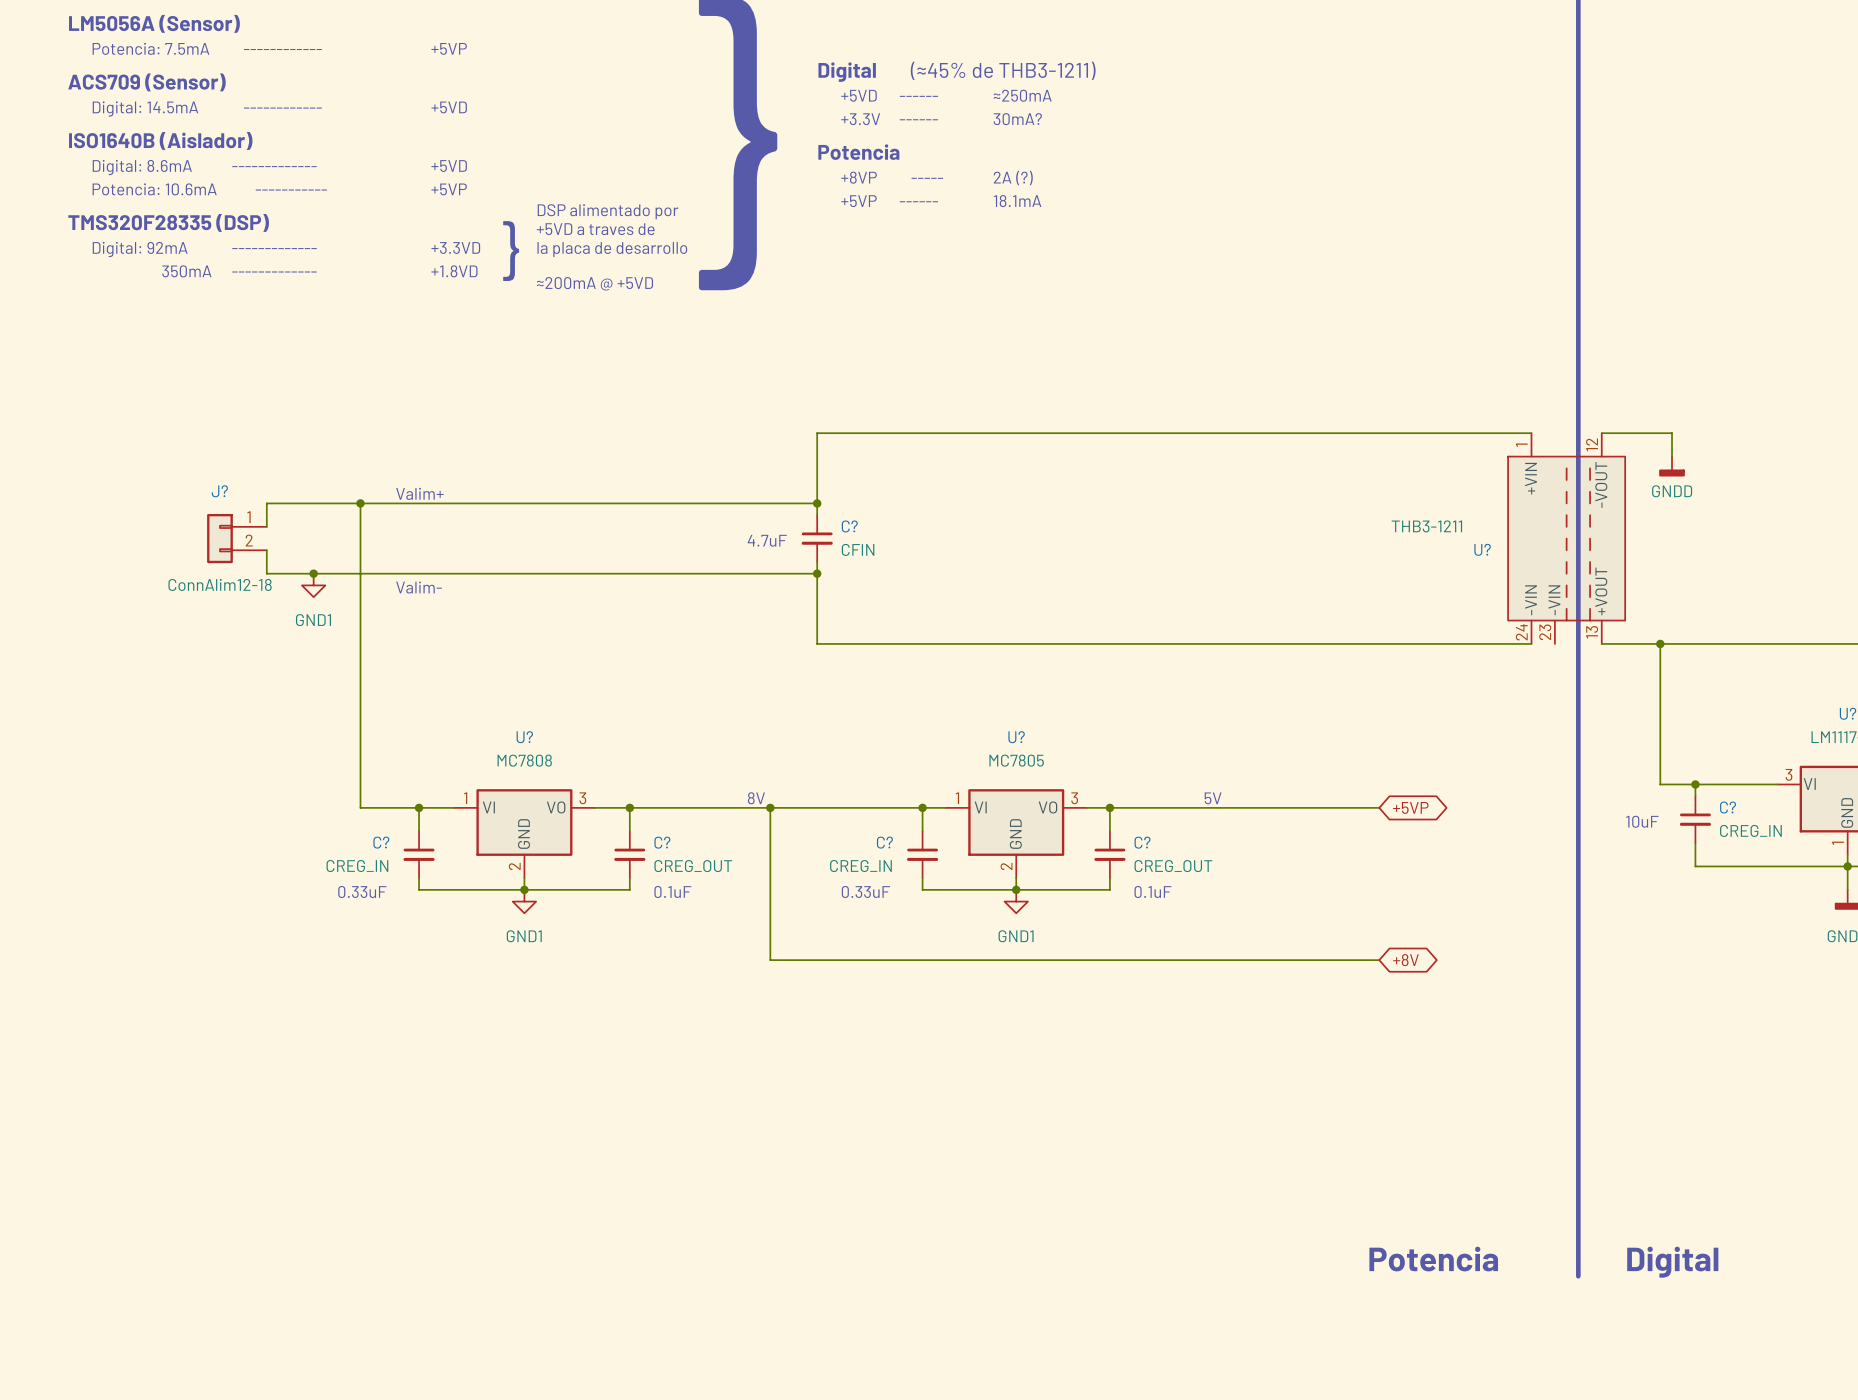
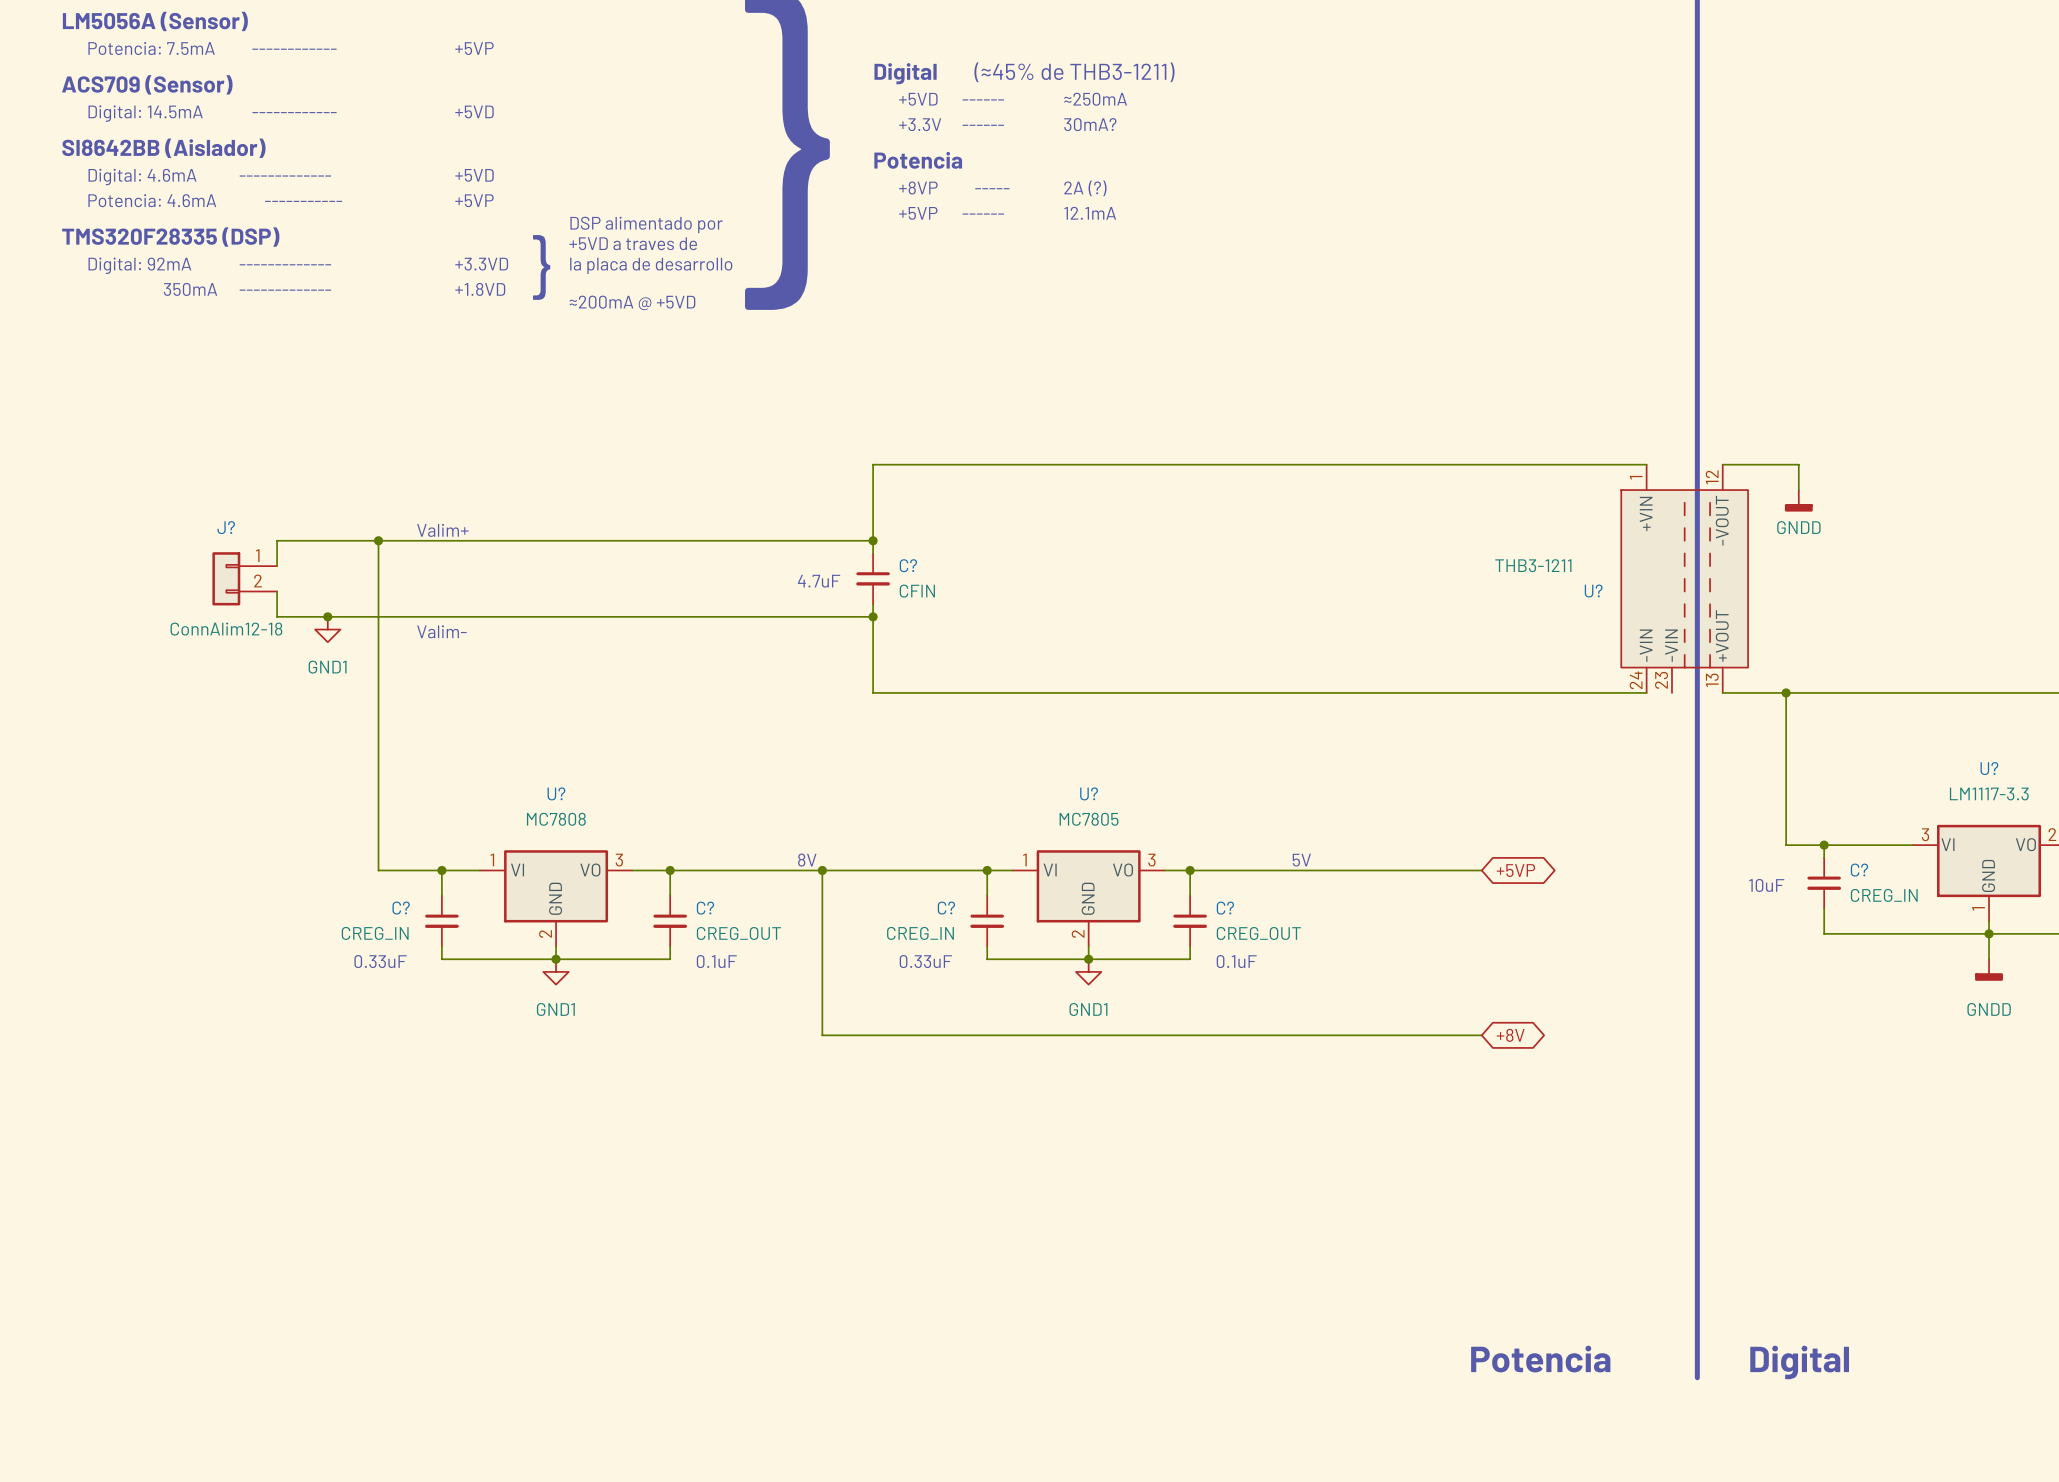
text: ISO1640B (Aislador) (160, 140) -> SI8642BB (Aislador) (163, 148)
text: Digital: 8.6mA (142, 167) -> Digital: 4.6mA (142, 177)
text: Potencia: 10.6mA (154, 189) -> Potencia: 4.6mA (152, 200)
text: 18.1mA (1017, 201) -> 12.1mA (1090, 213)

